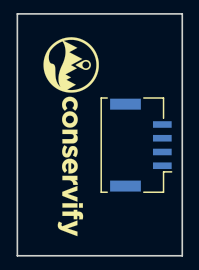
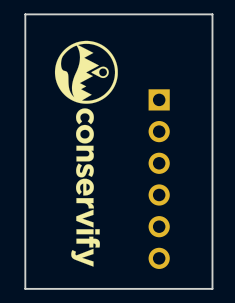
part: (136, 145) -> none
part: none -> (159, 179)

